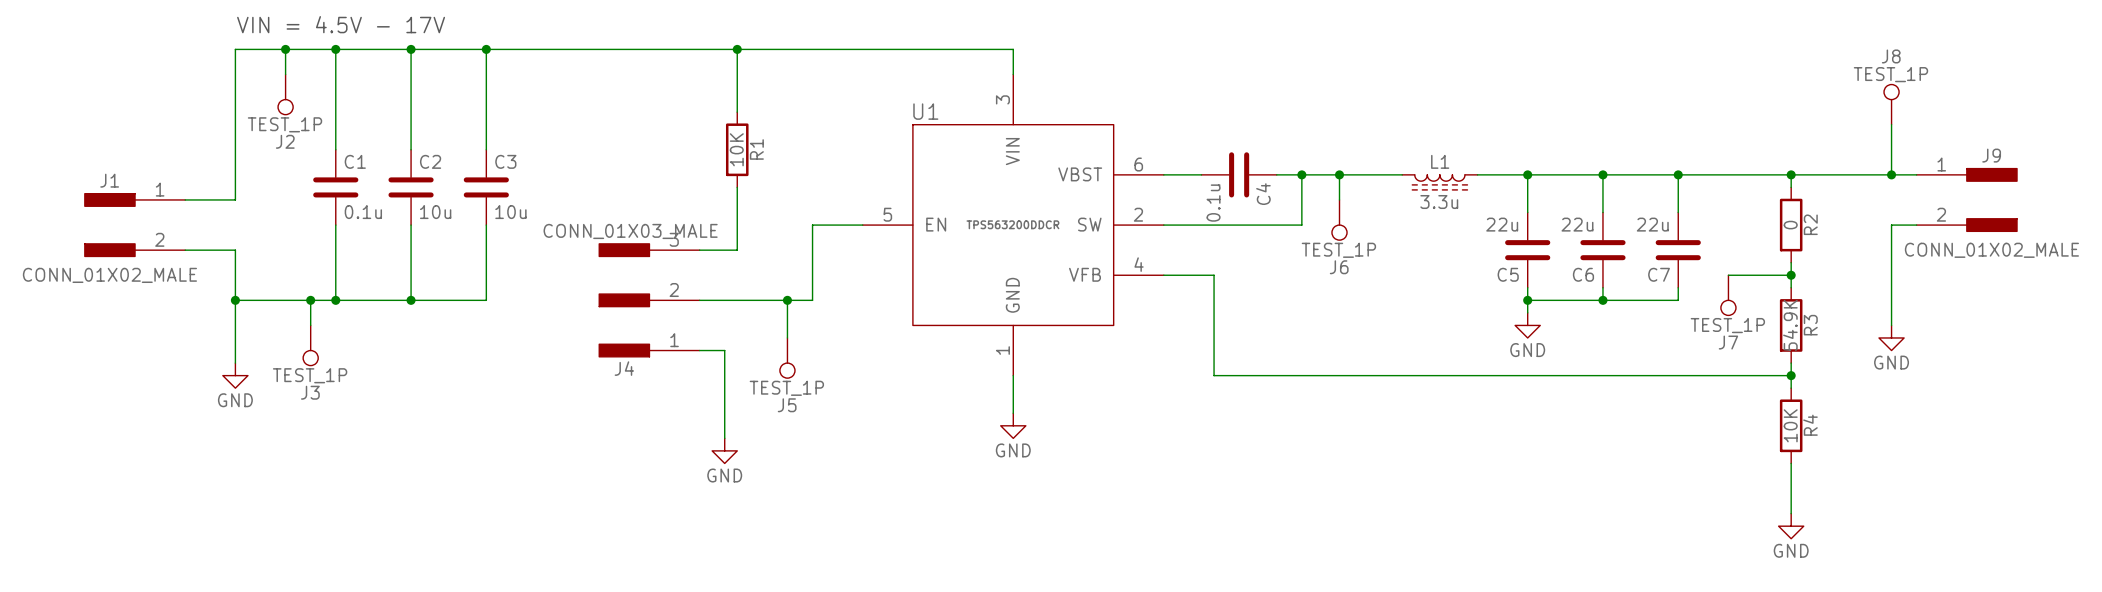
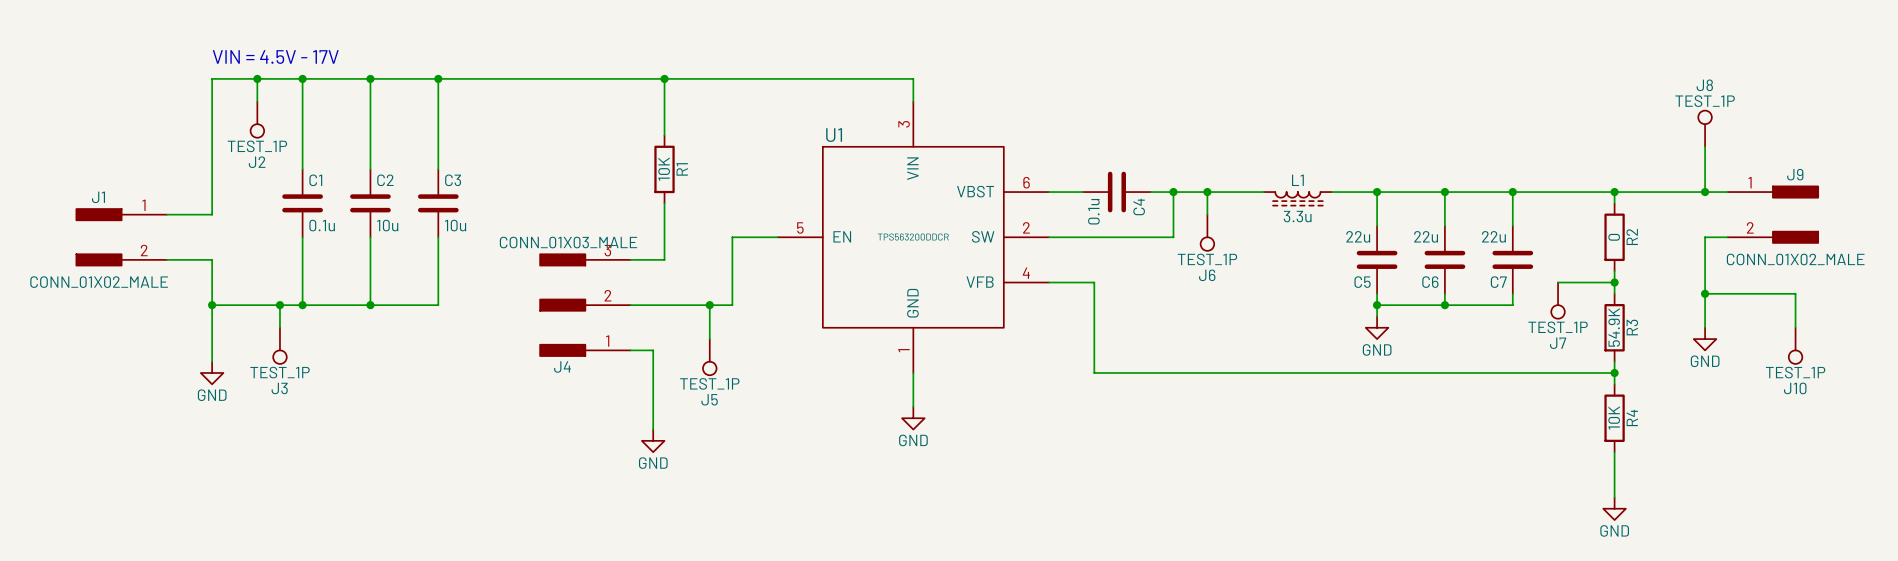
wire: none -> (1705, 293) (1795, 293) (1795, 327)
junction: none -> (1705, 293)
J10: none -> TEST_1P (1795, 345)

